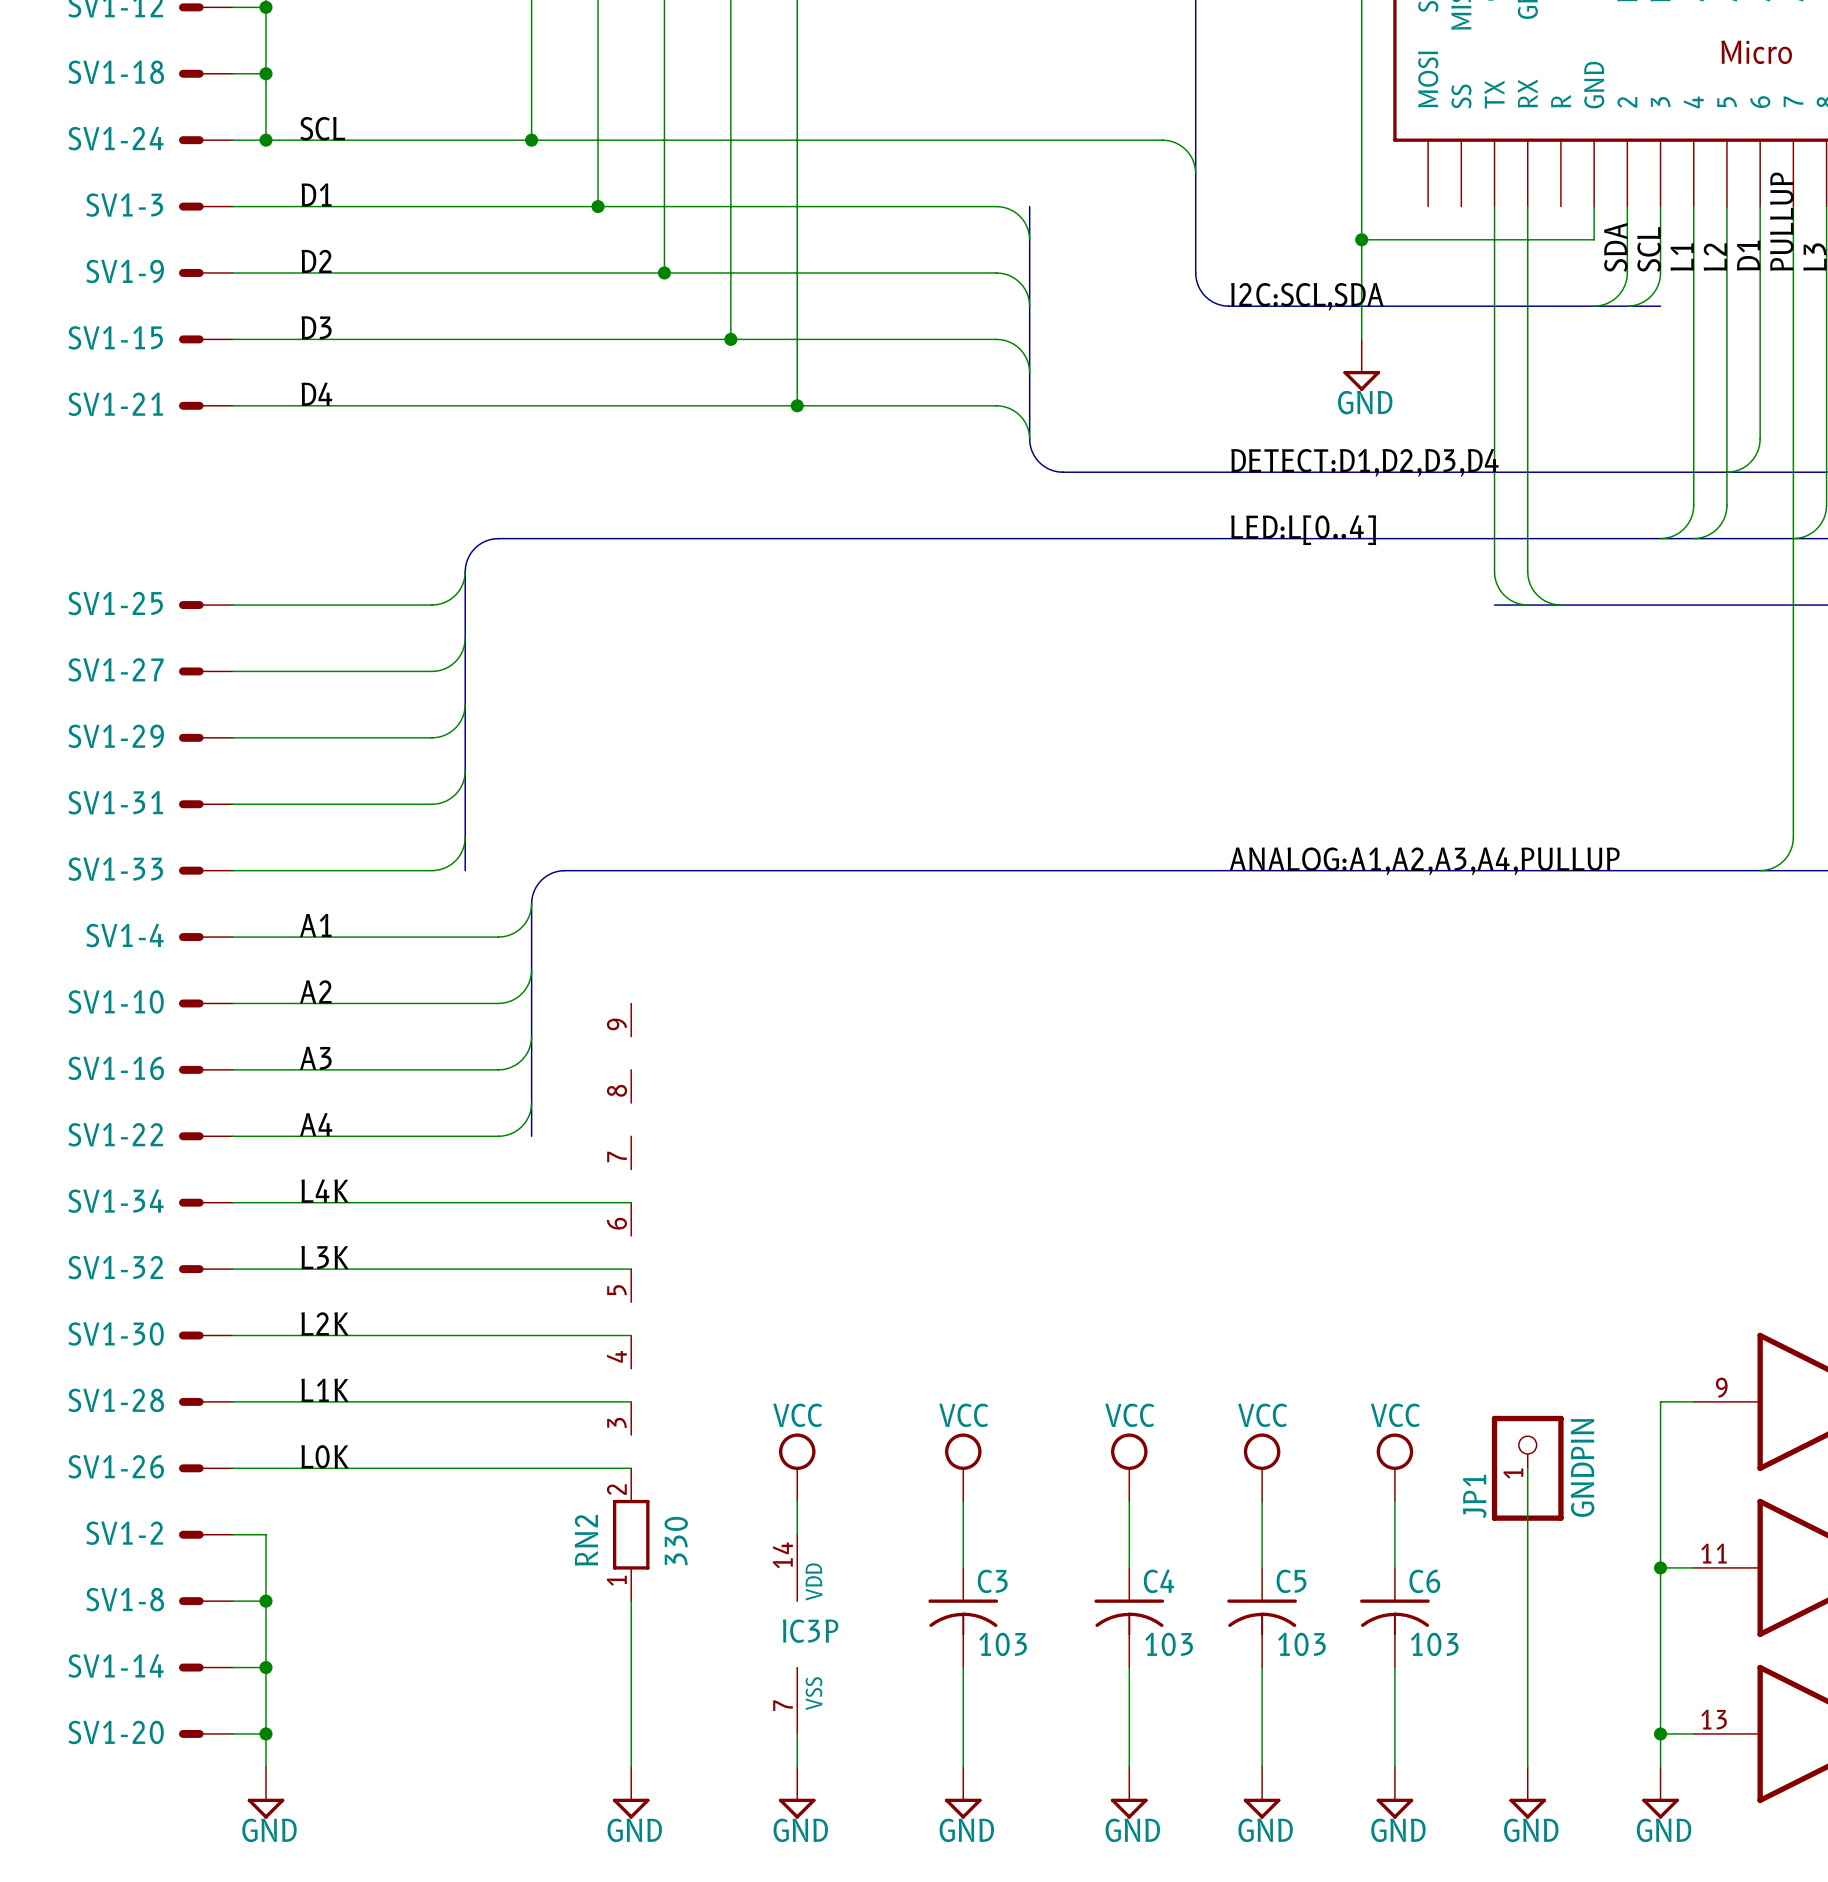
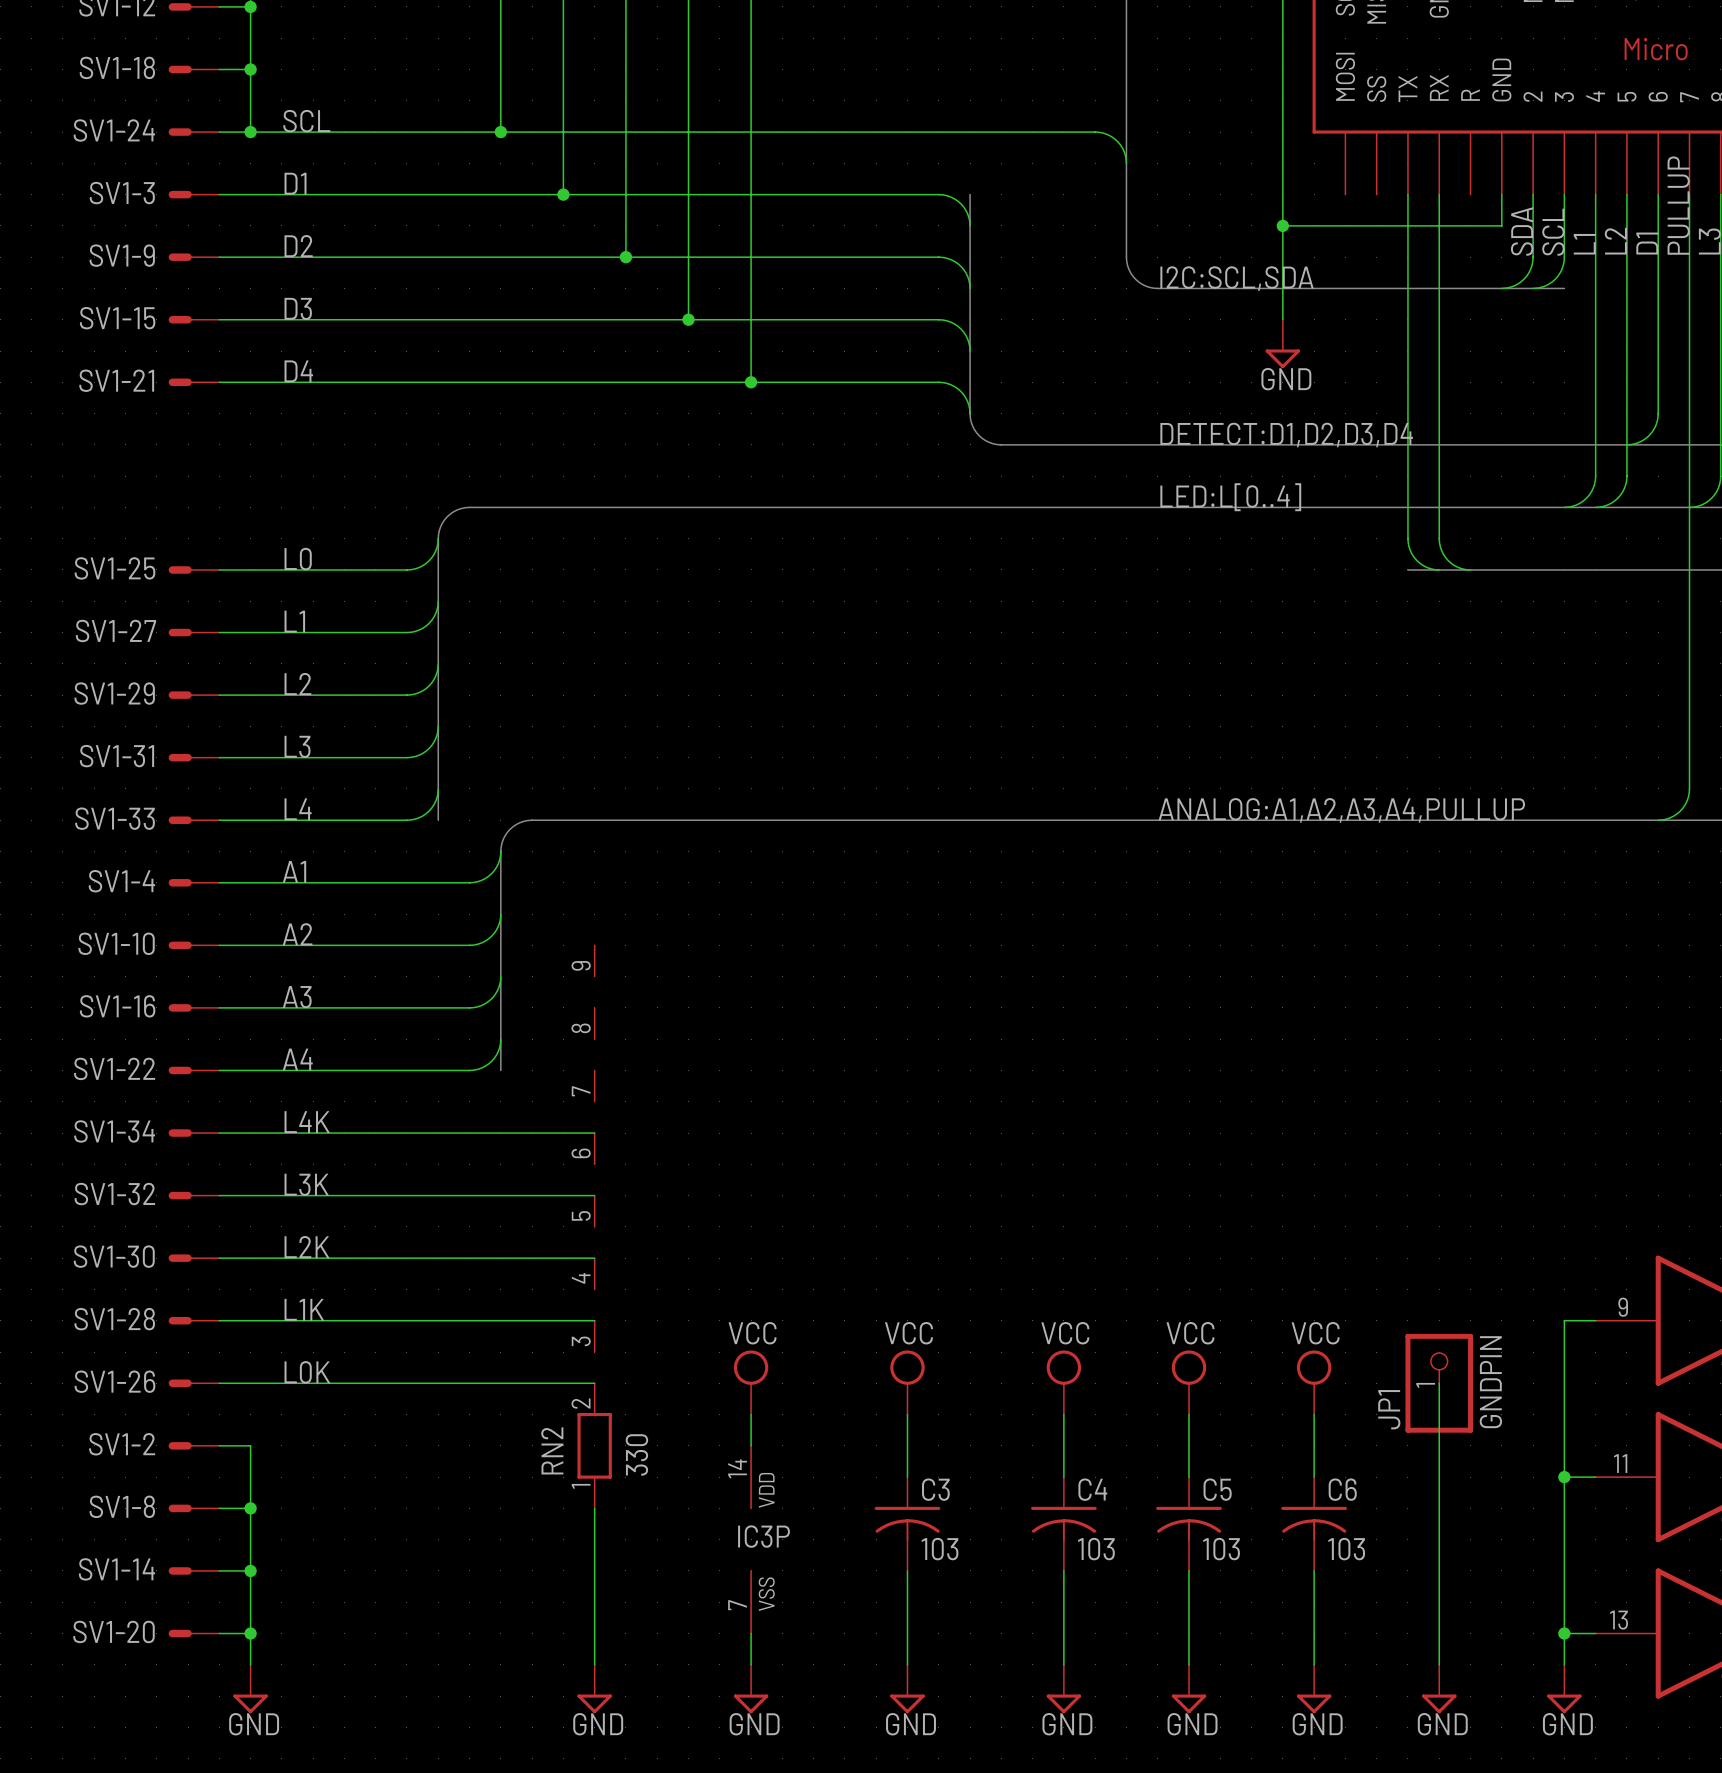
label: none -> L0 (298, 559)
label: none -> L1 (294, 621)
label: none -> L2 (297, 684)
label: none -> L3 (297, 746)
label: none -> L4 (298, 809)

